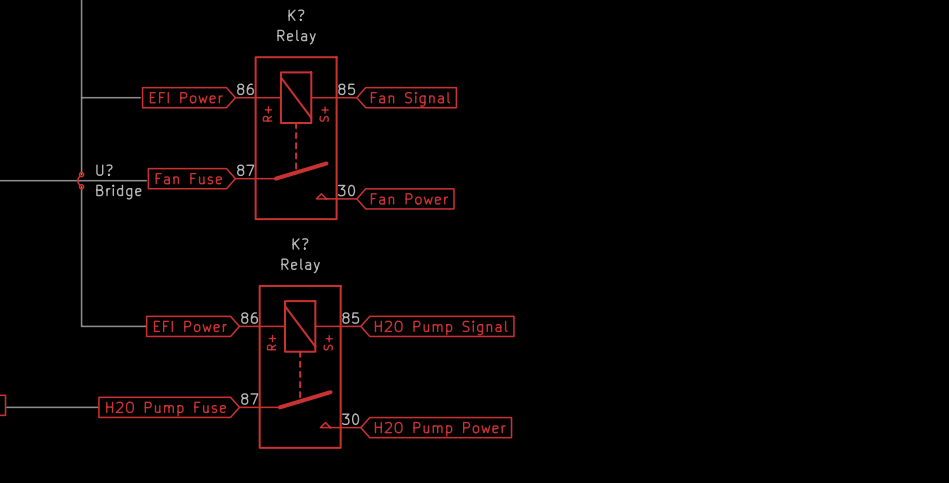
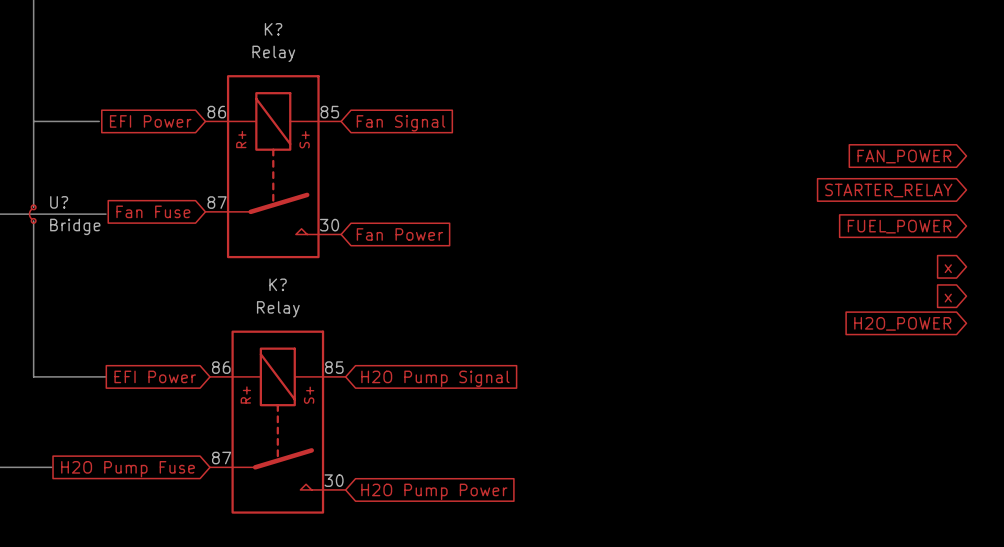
global label: none -> FAN_POWER (904, 156)
global label: none -> STARTER_RELAY (888, 190)
global label: none -> FUEL_POWER (899, 226)
global label: none -> x (948, 268)
global label: none -> x (948, 298)
global label: none -> H2O_POWER (902, 323)

